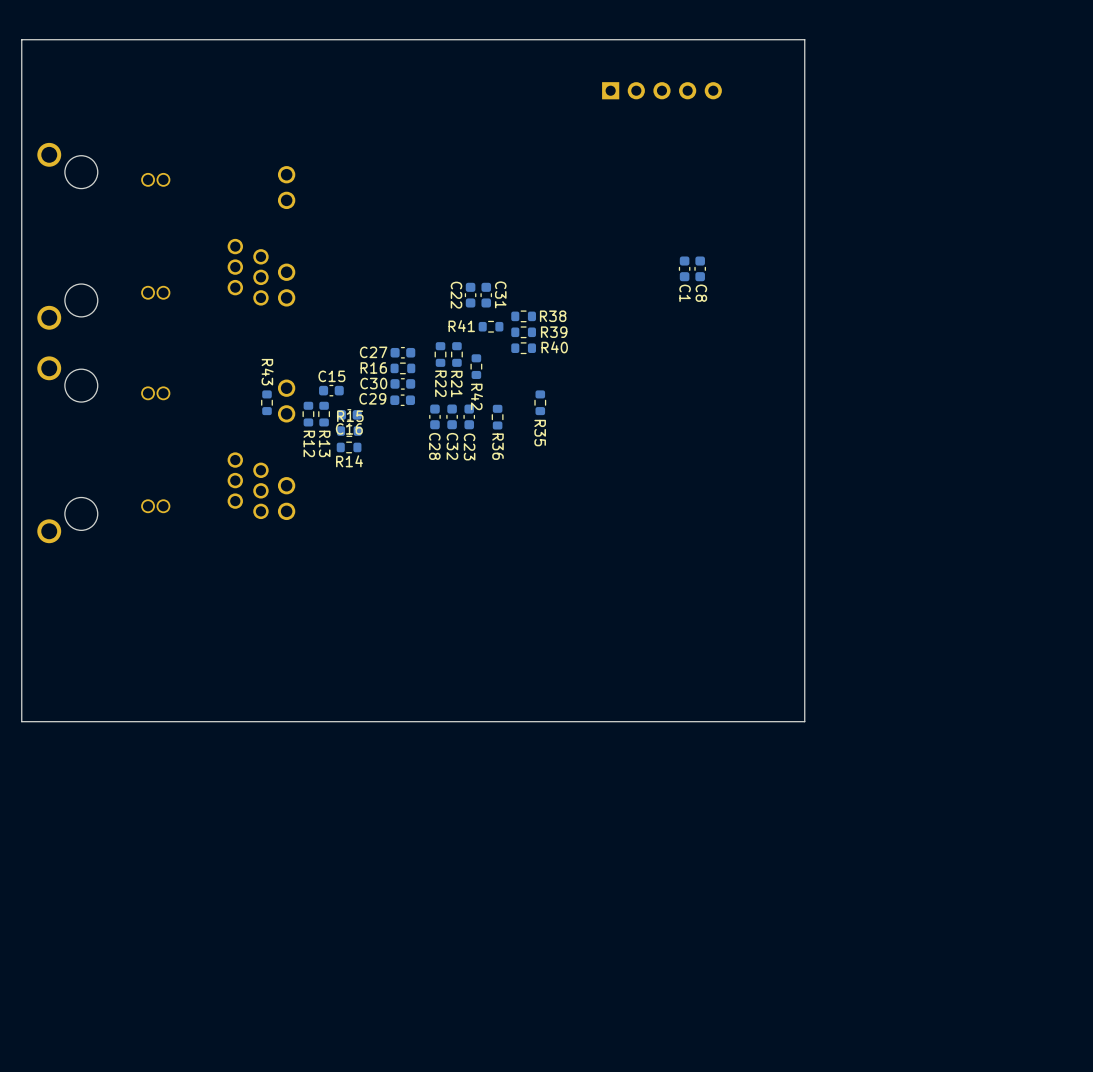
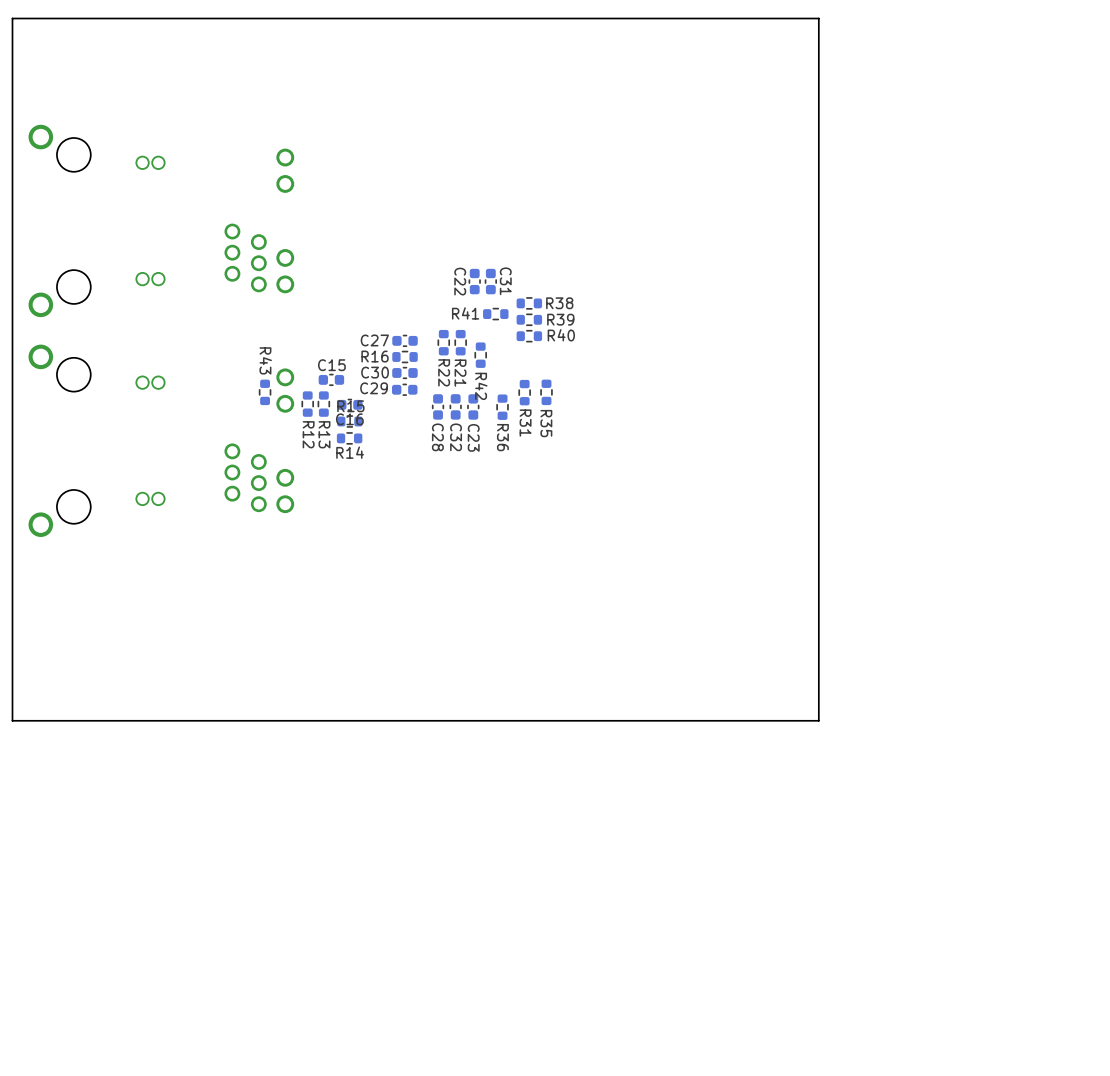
part: (661, 90) -> none
C1: (684, 268) -> none
C8: (700, 268) -> none
R31: none -> (524, 392)

